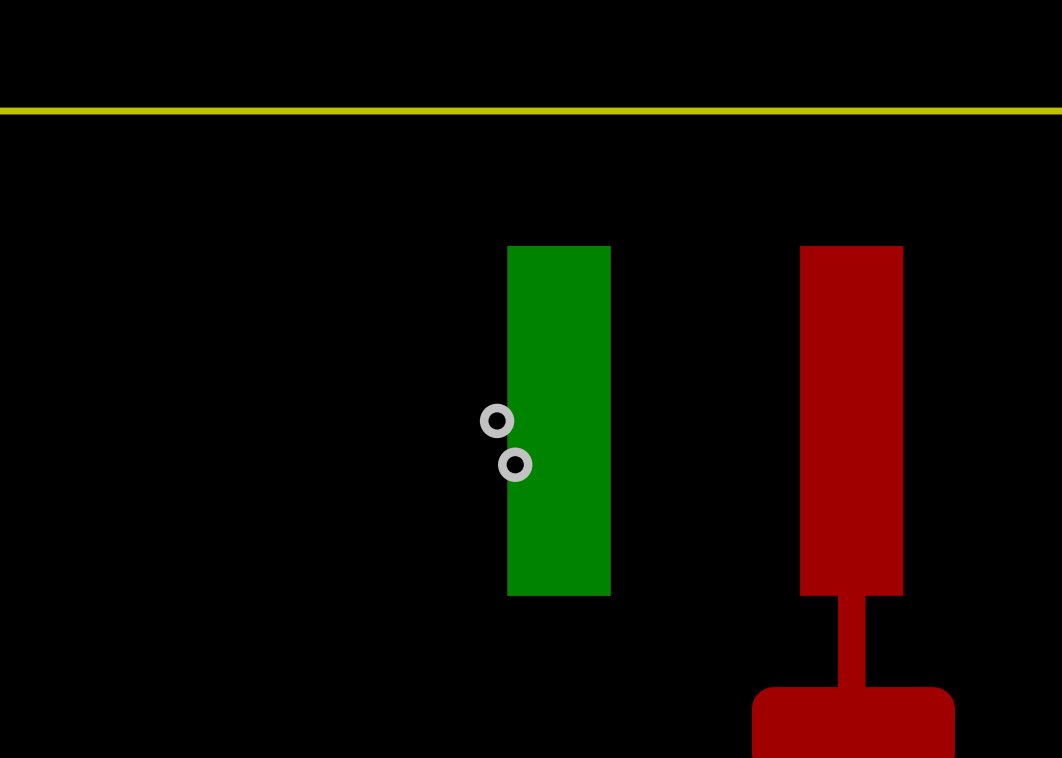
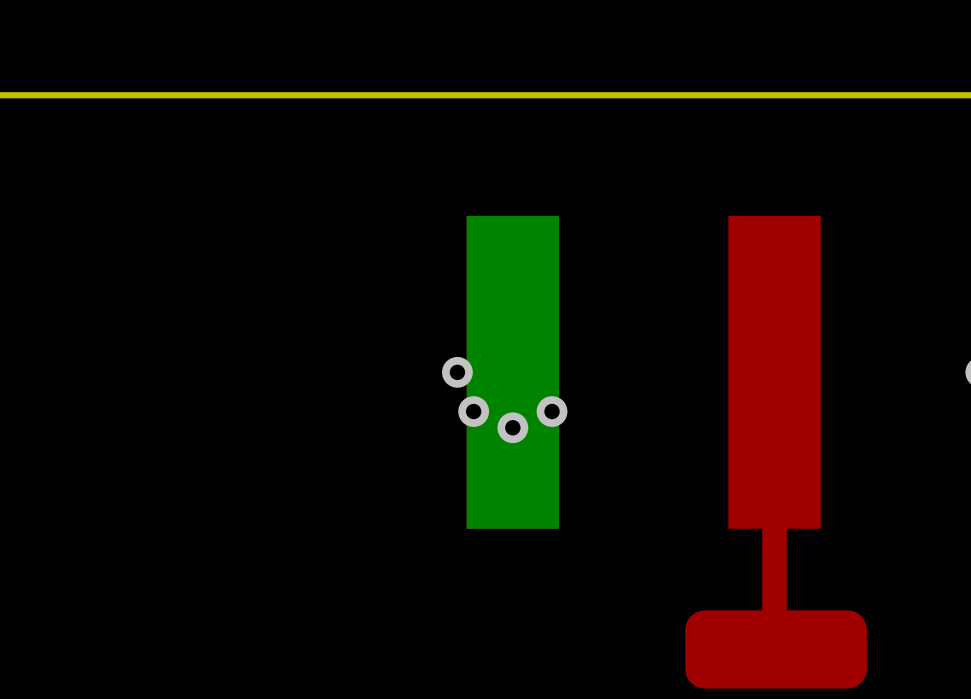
via: none -> (552, 411)
via: none -> (512, 427)

